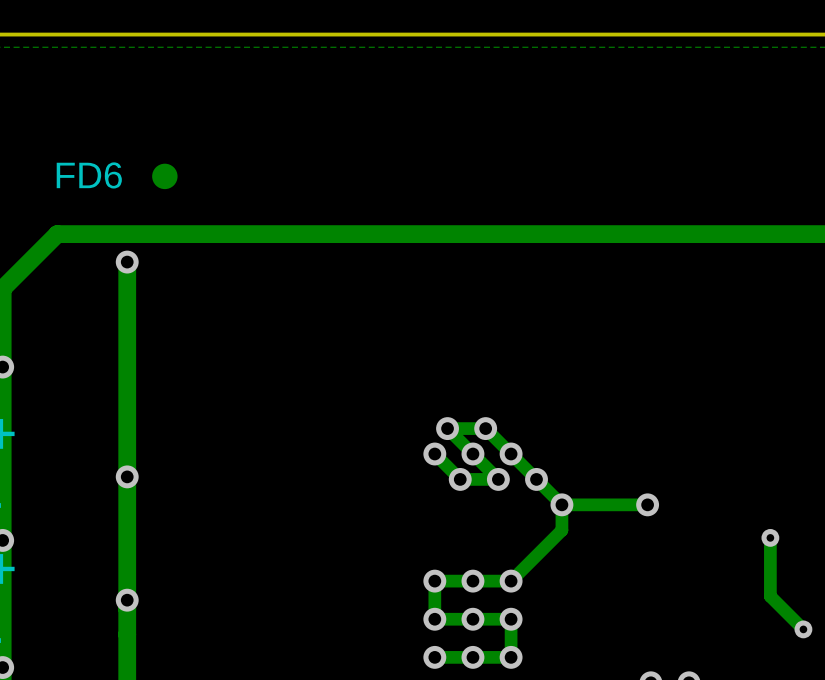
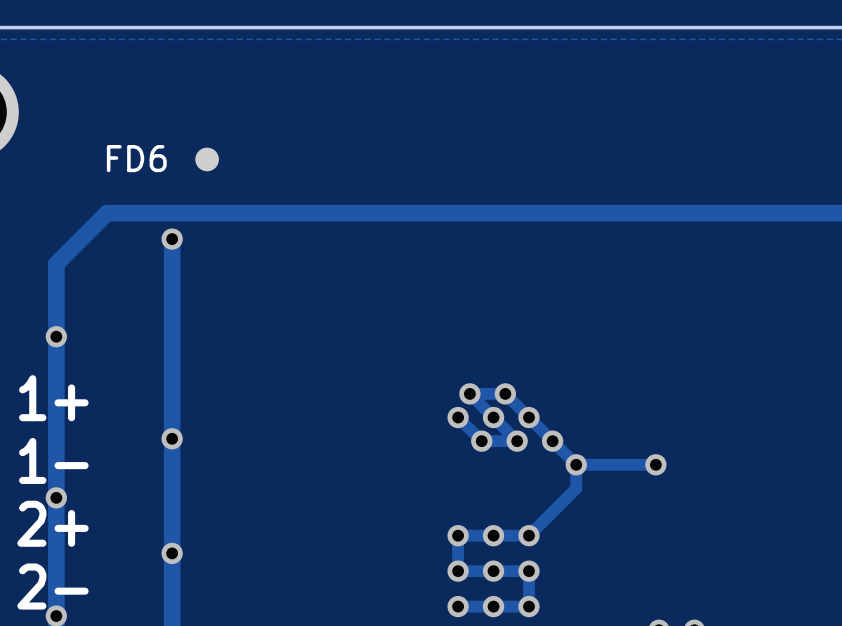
track: (770, 537) (770, 596) (803, 629) -> none
via: (770, 537) -> none
via: (803, 629) -> none

